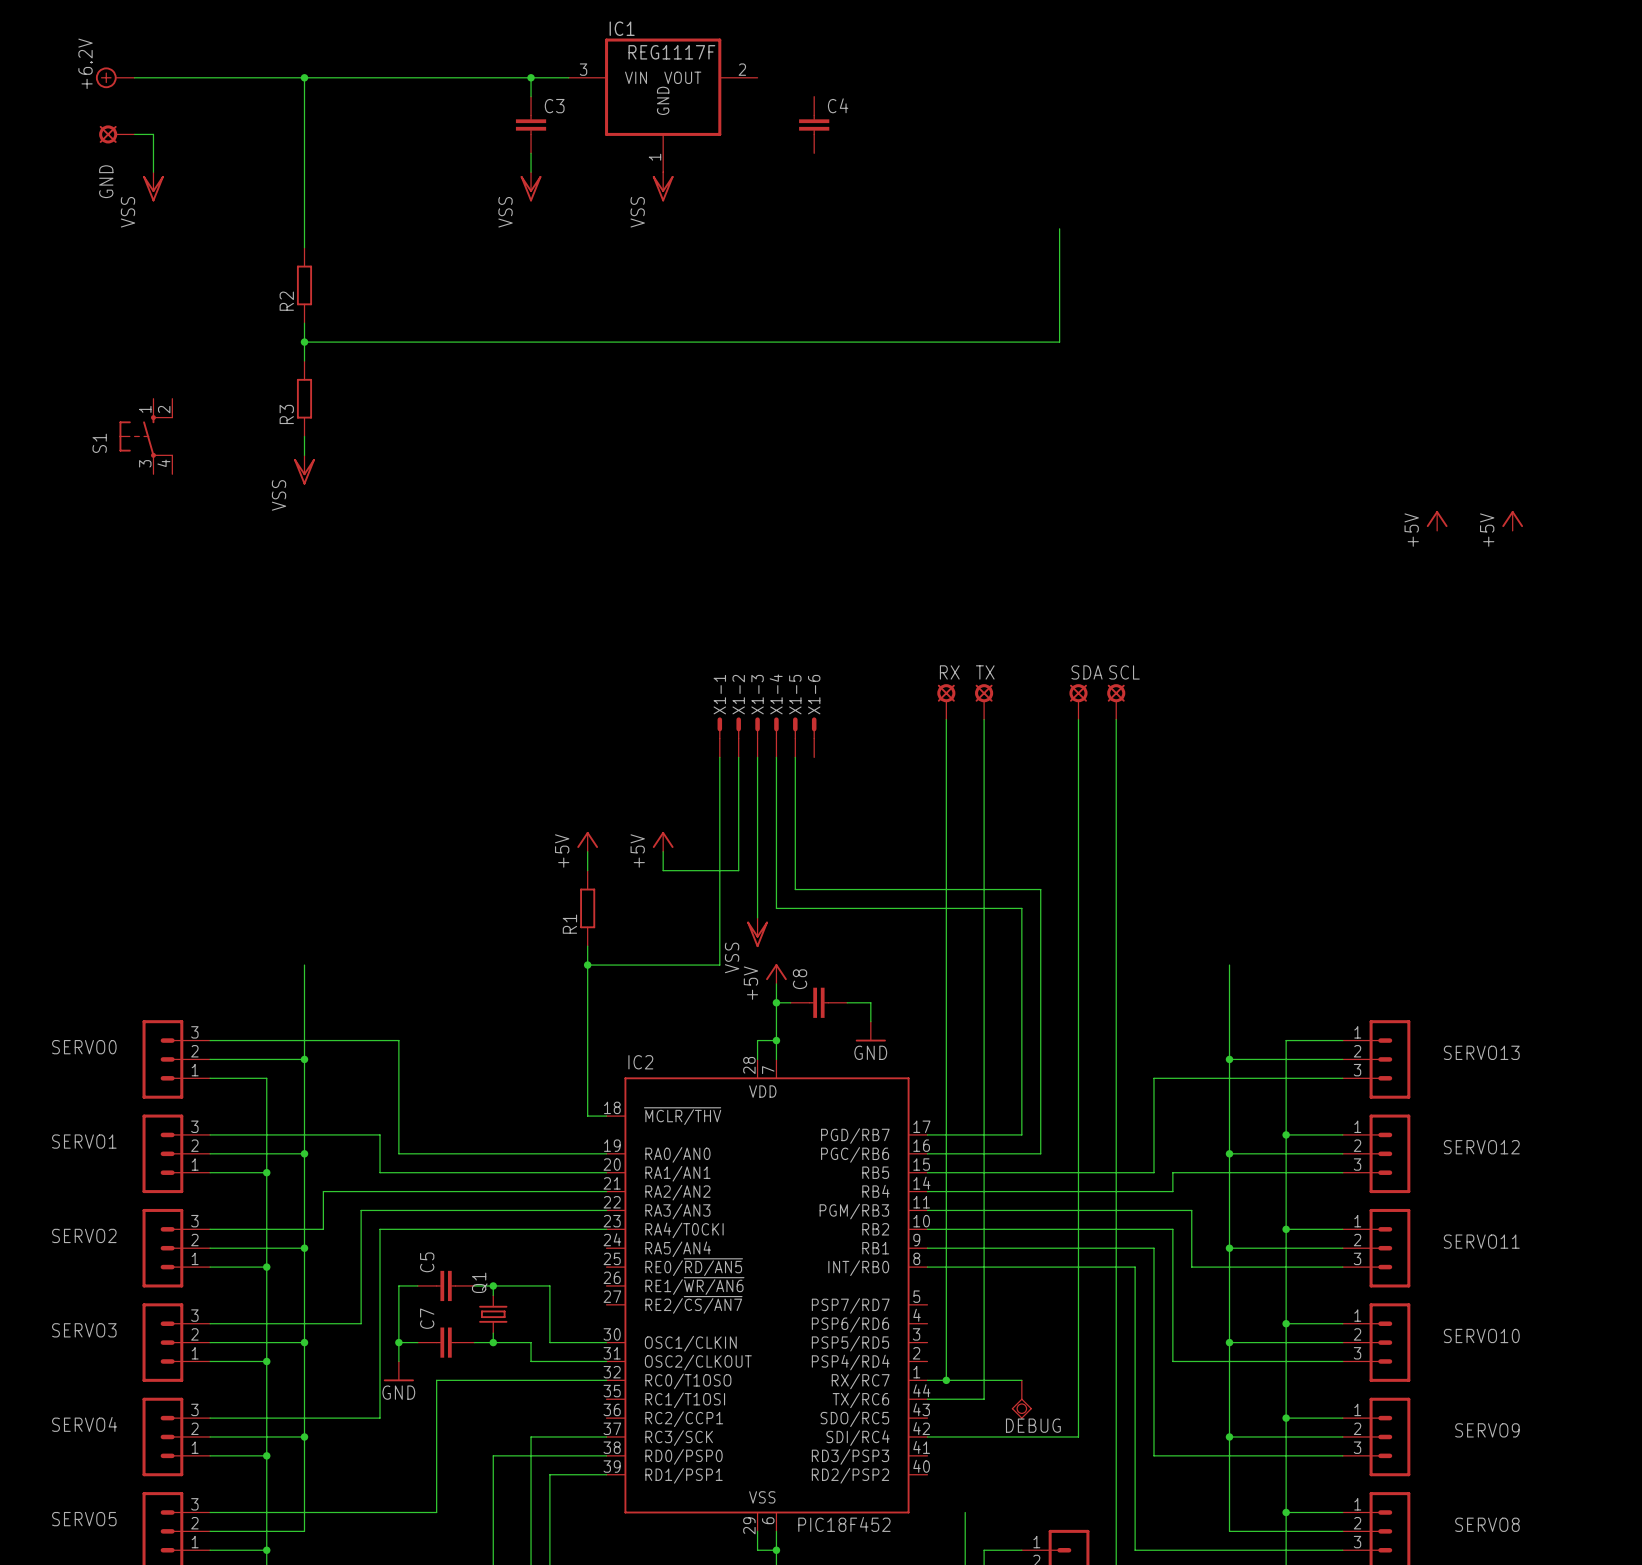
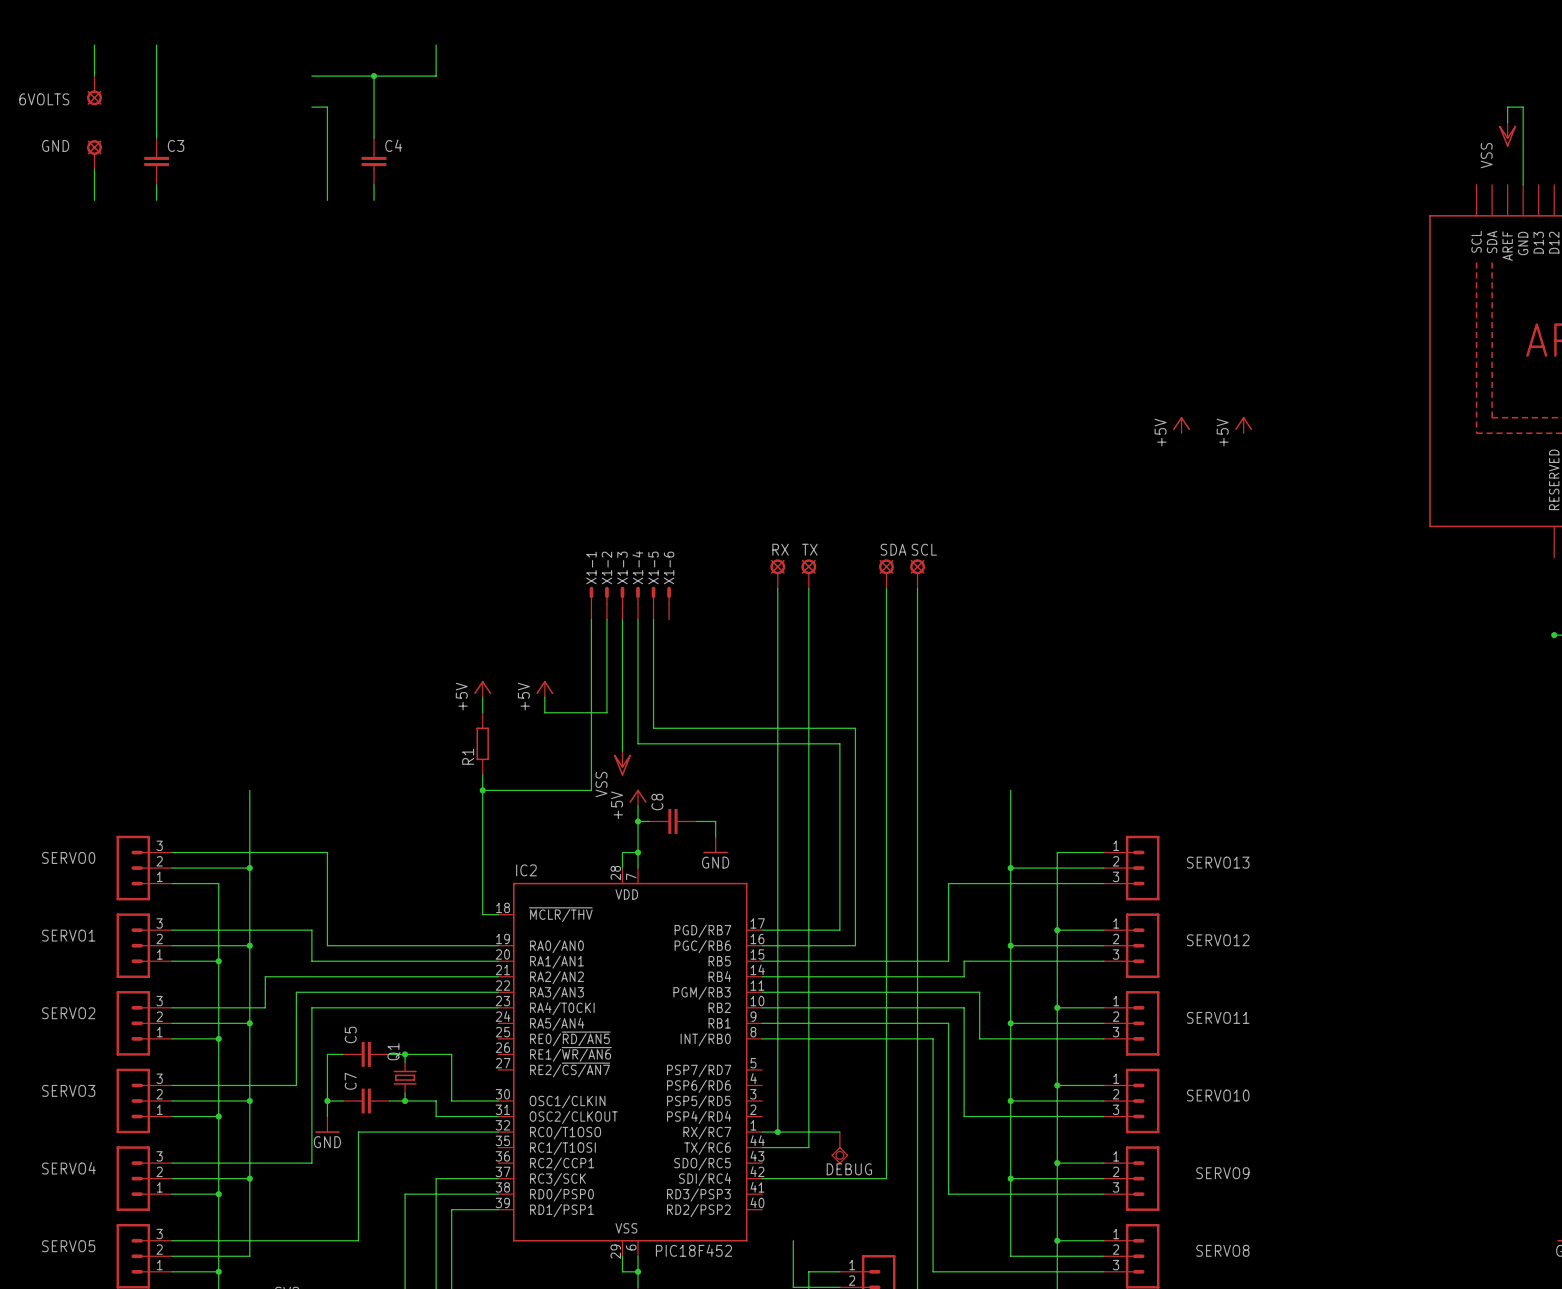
wire: none -> (94, 45) (94, 76)
wire: none -> (156, 45) (156, 138)
power symbol: +6.2V (115, 77) -> none
wire: (134, 77) (568, 77) -> none
wire: (304, 77) (304, 247) -> none
junction: (304, 77) -> none
junction: (531, 77) -> none
wire: none -> (311, 76) (436, 76)
wire: none -> (374, 76) (374, 138)
junction: none -> (374, 76)
IC1: REG1117F (663, 105) -> none
6VOLTS: none -> (94, 90)
C3 position: (531, 124) -> (156, 161)
C4 position: (814, 124) -> (374, 161)
GND rotation: 0° (108, 134) -> 90° clockwise (94, 147)
GND position: (116, 134) -> (94, 154)
wire: (134, 134) (153, 134) (153, 172) -> none
wire: none -> (311, 107) (327, 107) (327, 200)
wire: (531, 153) (531, 172) -> (436, 45) (436, 60)
power symbol: VSS (153, 186) -> none
power symbol: VSS (531, 186) -> none
power symbol: VSS (663, 186) -> none
wire: none -> (94, 169) (94, 200)
wire: none -> (156, 184) (156, 200)
wire: none -> (374, 184) (374, 200)
wire: (1059, 228) (1059, 342) (304, 342) -> none
R2: (304, 285) -> none
wire: (304, 323) (304, 360) -> none
junction: (304, 342) -> none
R3: (304, 398) -> none
S1: (146, 436) -> none
wire: (304, 436) (304, 455) -> none
power symbol: VSS (304, 469) -> none

